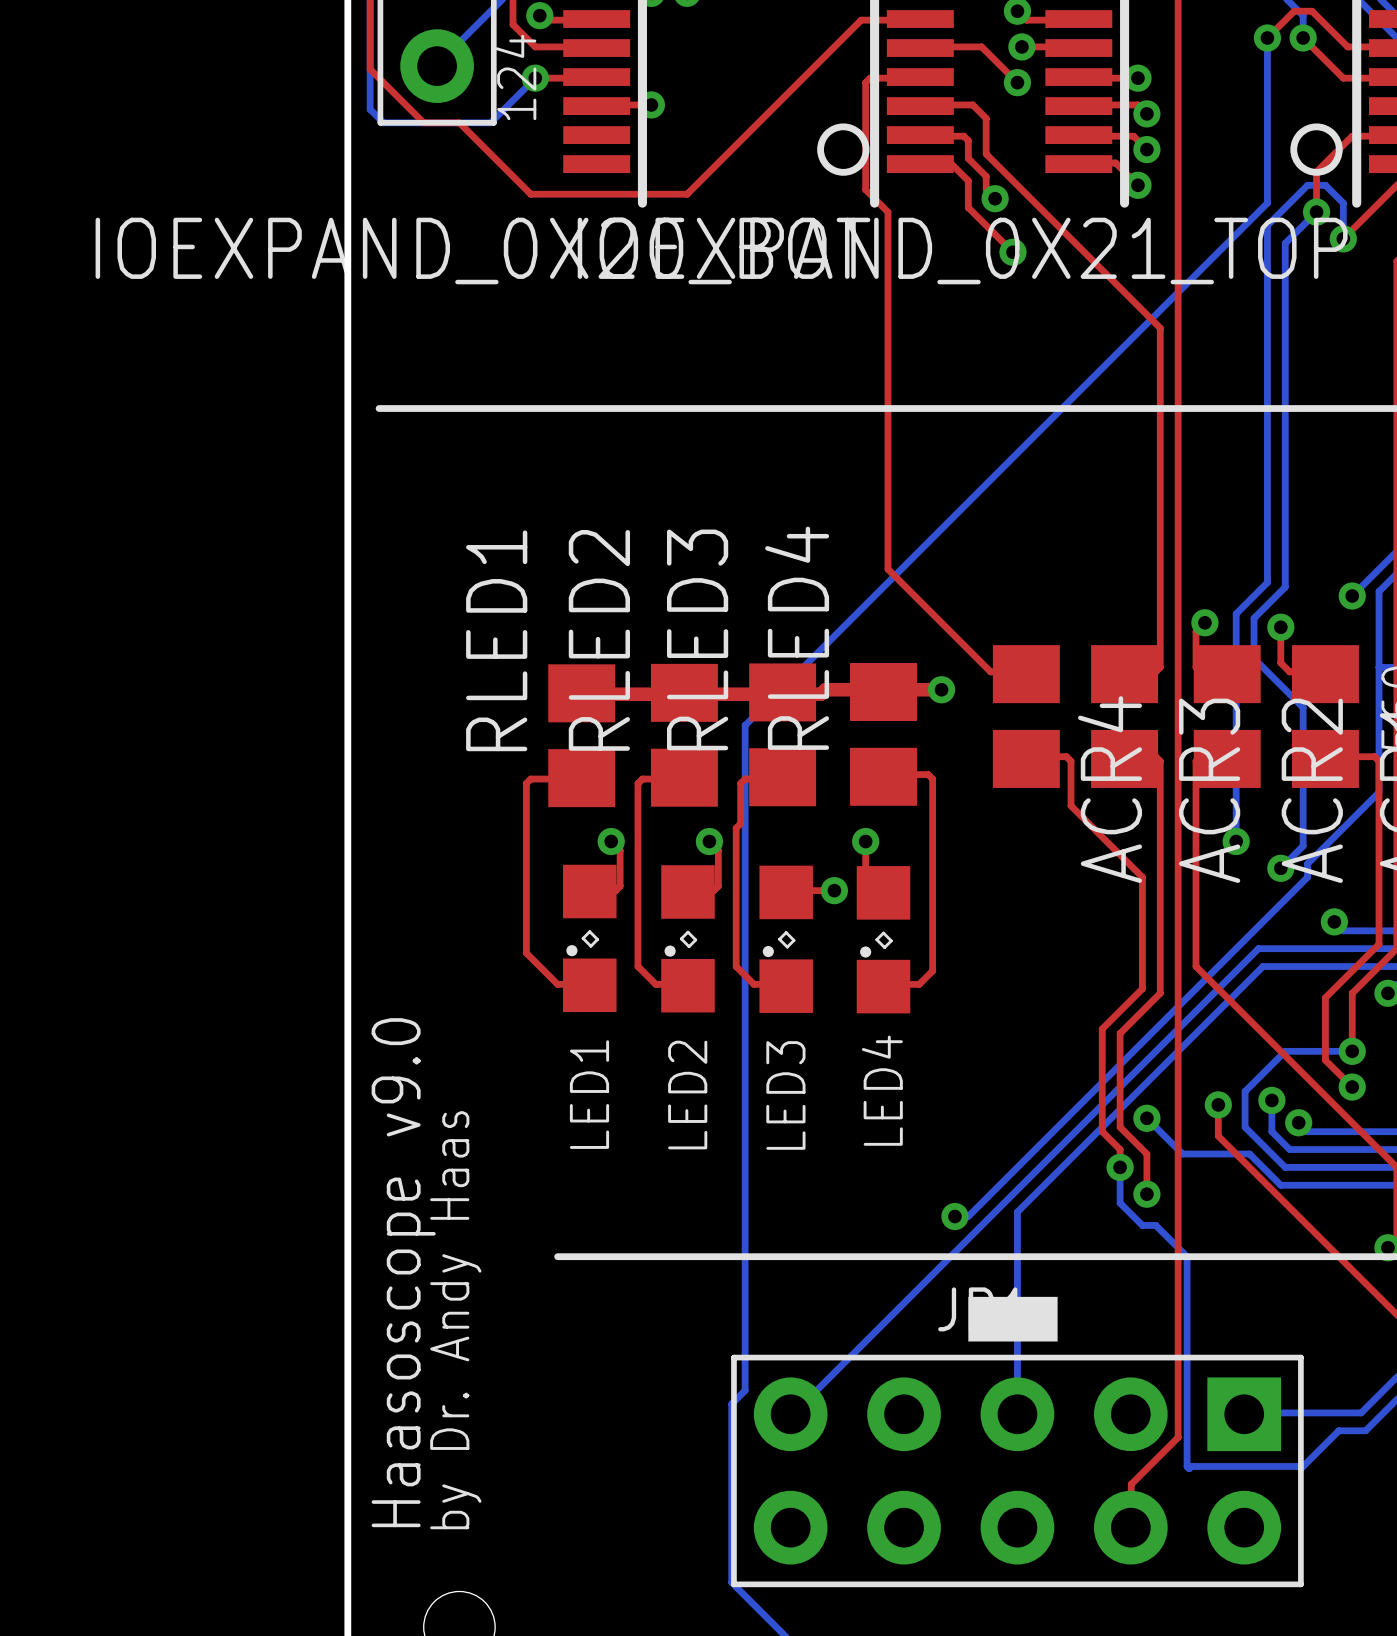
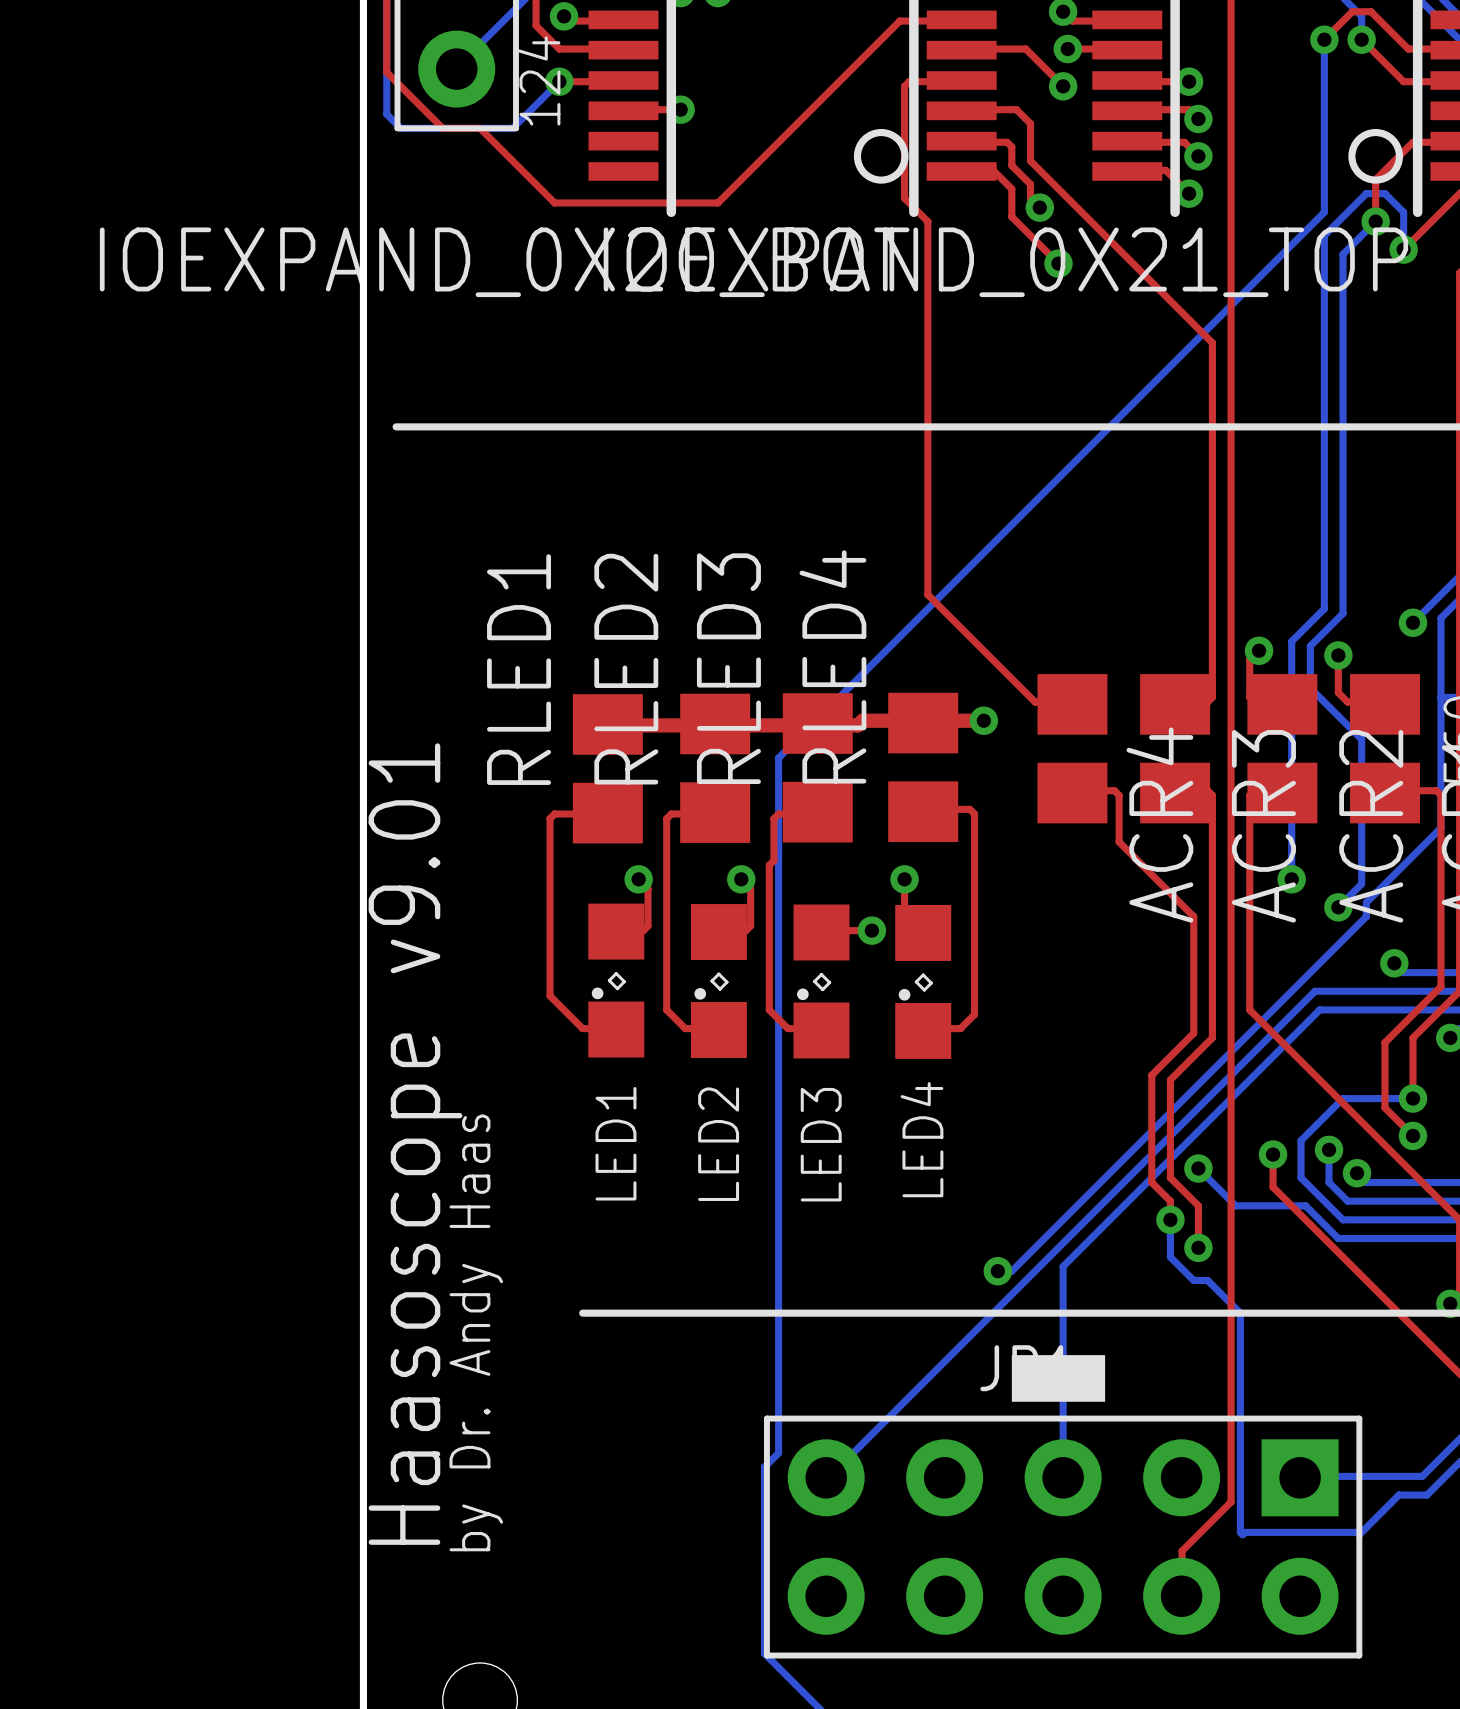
text: Haasoscope v9.0 (403, 1272) -> Haasoscope v9.01 (415, 1144)
text position: by Dr. Andy Haas (455, 1320) -> by Dr. Andy Haas (476, 1332)

